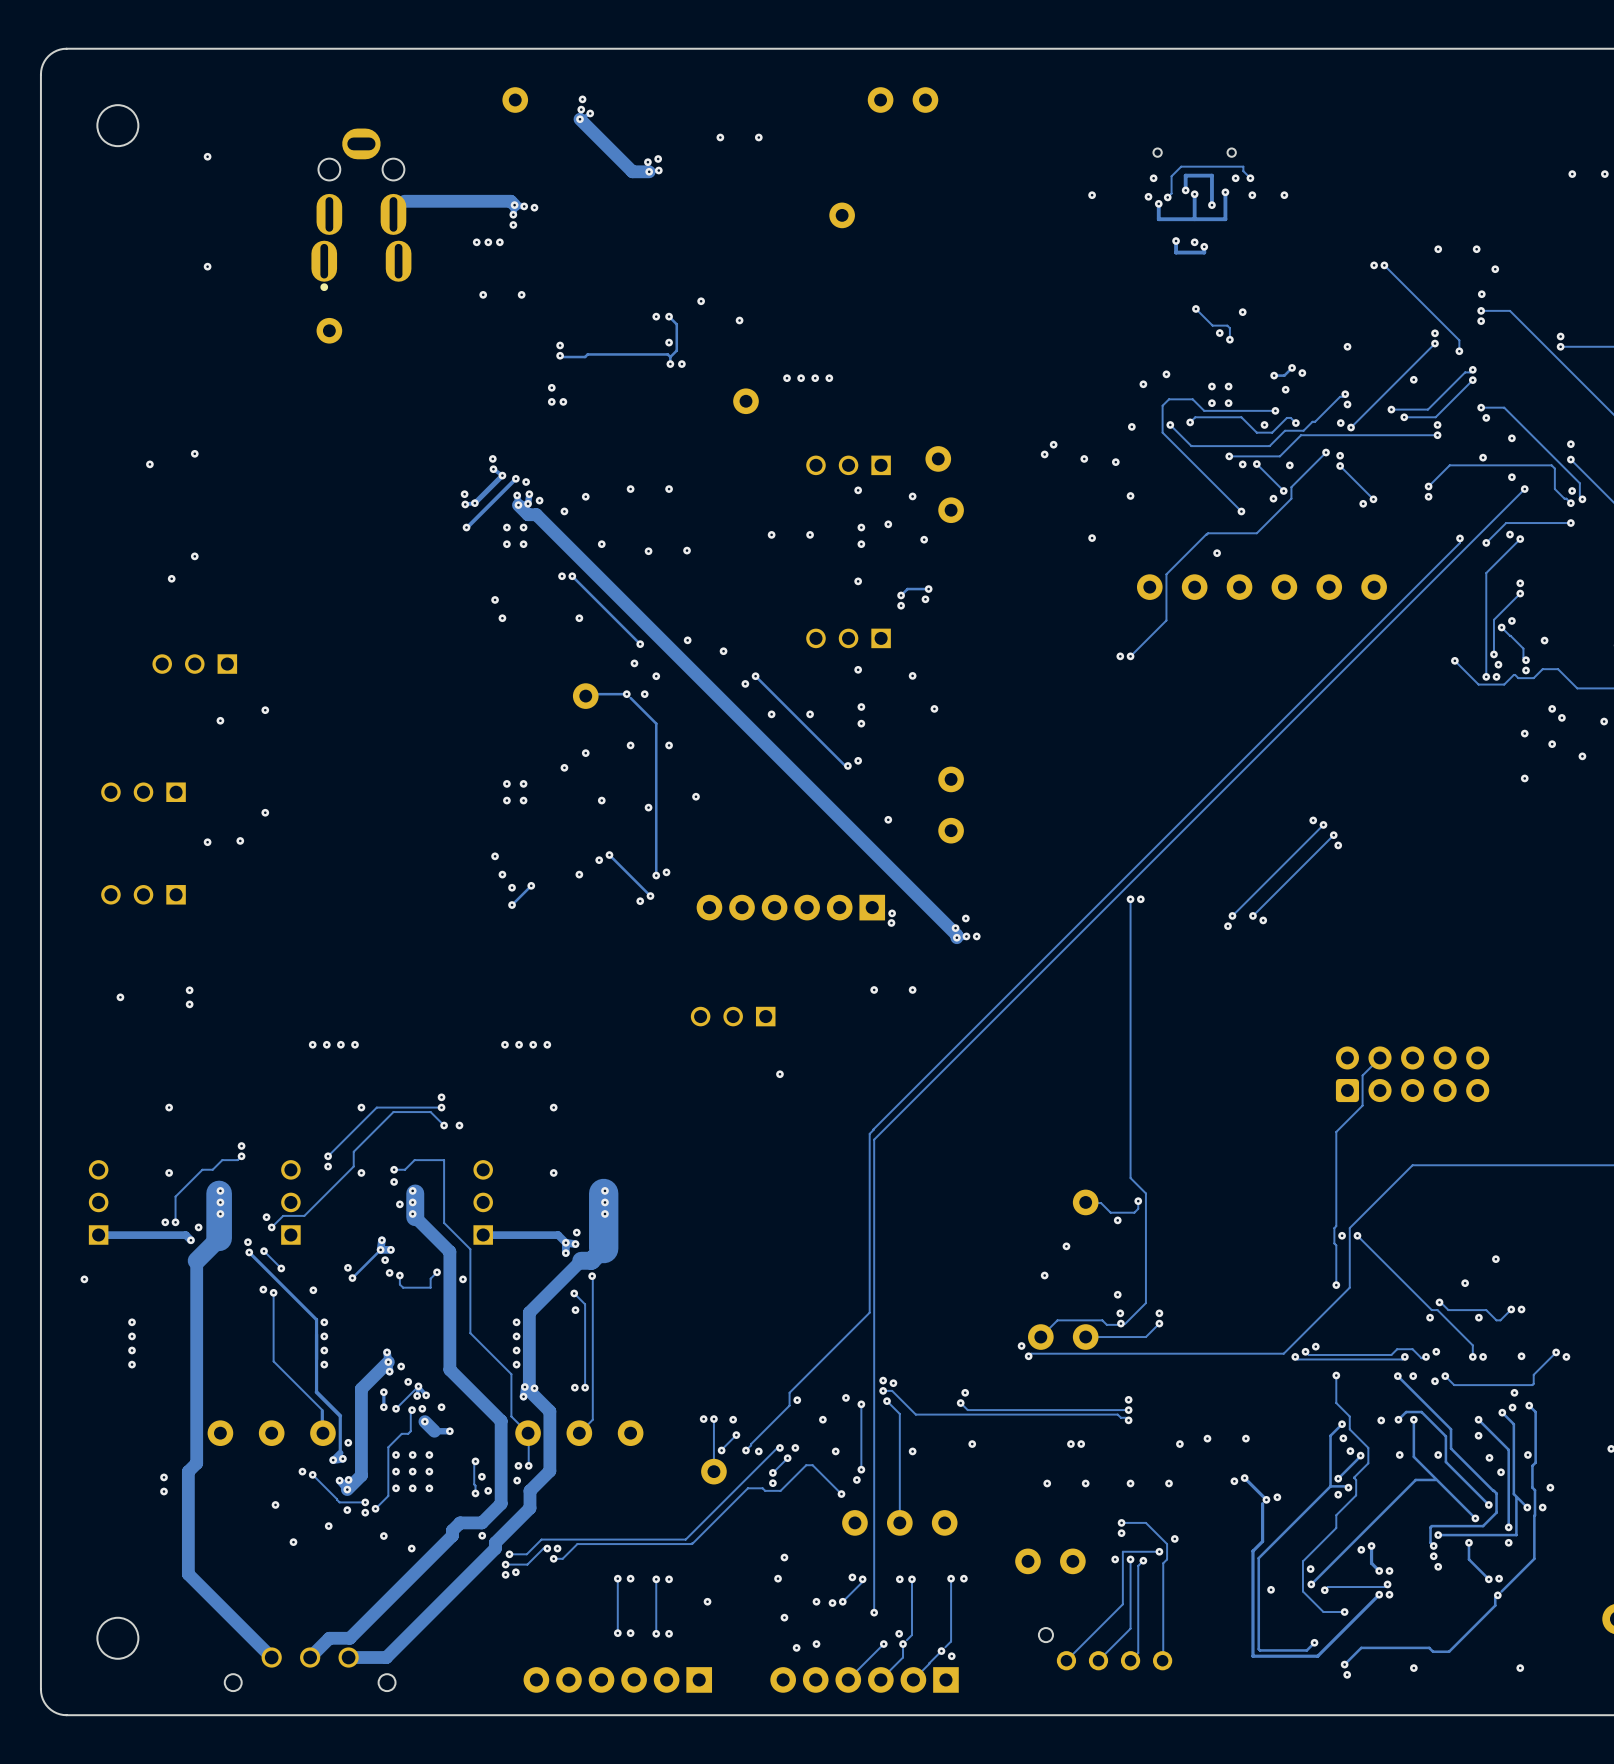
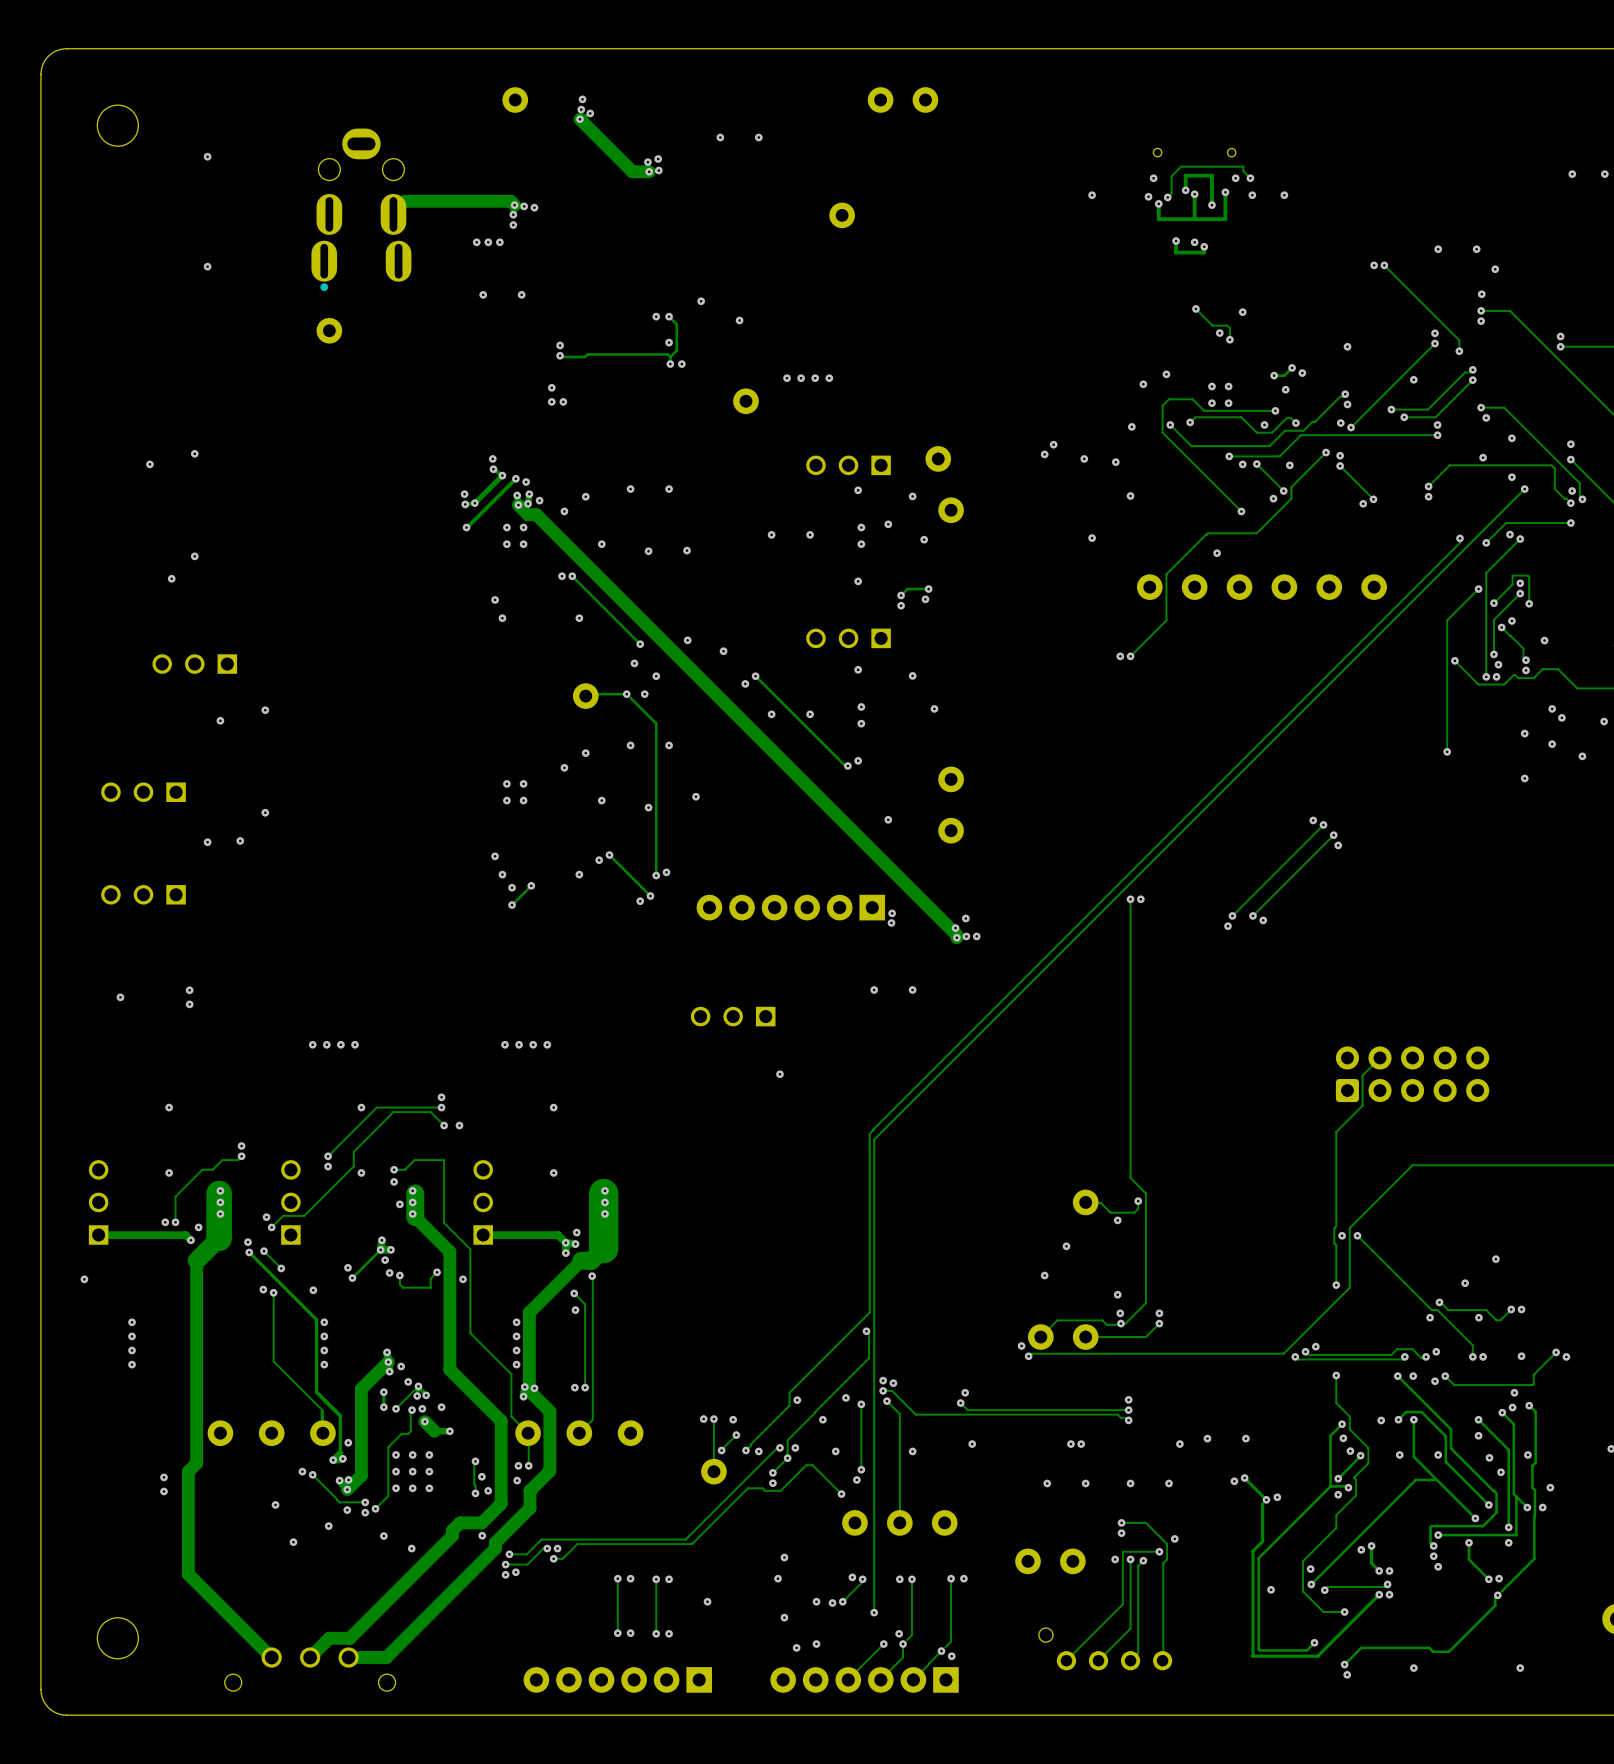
track: none -> (1478, 589) (1447, 620) (1447, 751)
via: none -> (1478, 589)
track: none -> (1493, 603) (1512, 584) (1512, 575) (1527, 575) (1529, 603)
via: none -> (1493, 603)
via: none -> (1529, 603)
via: none -> (1447, 751)
track: none -> (866, 1331) (869, 1333) (869, 1358) (787, 1440) (787, 1455)
via: none -> (866, 1331)

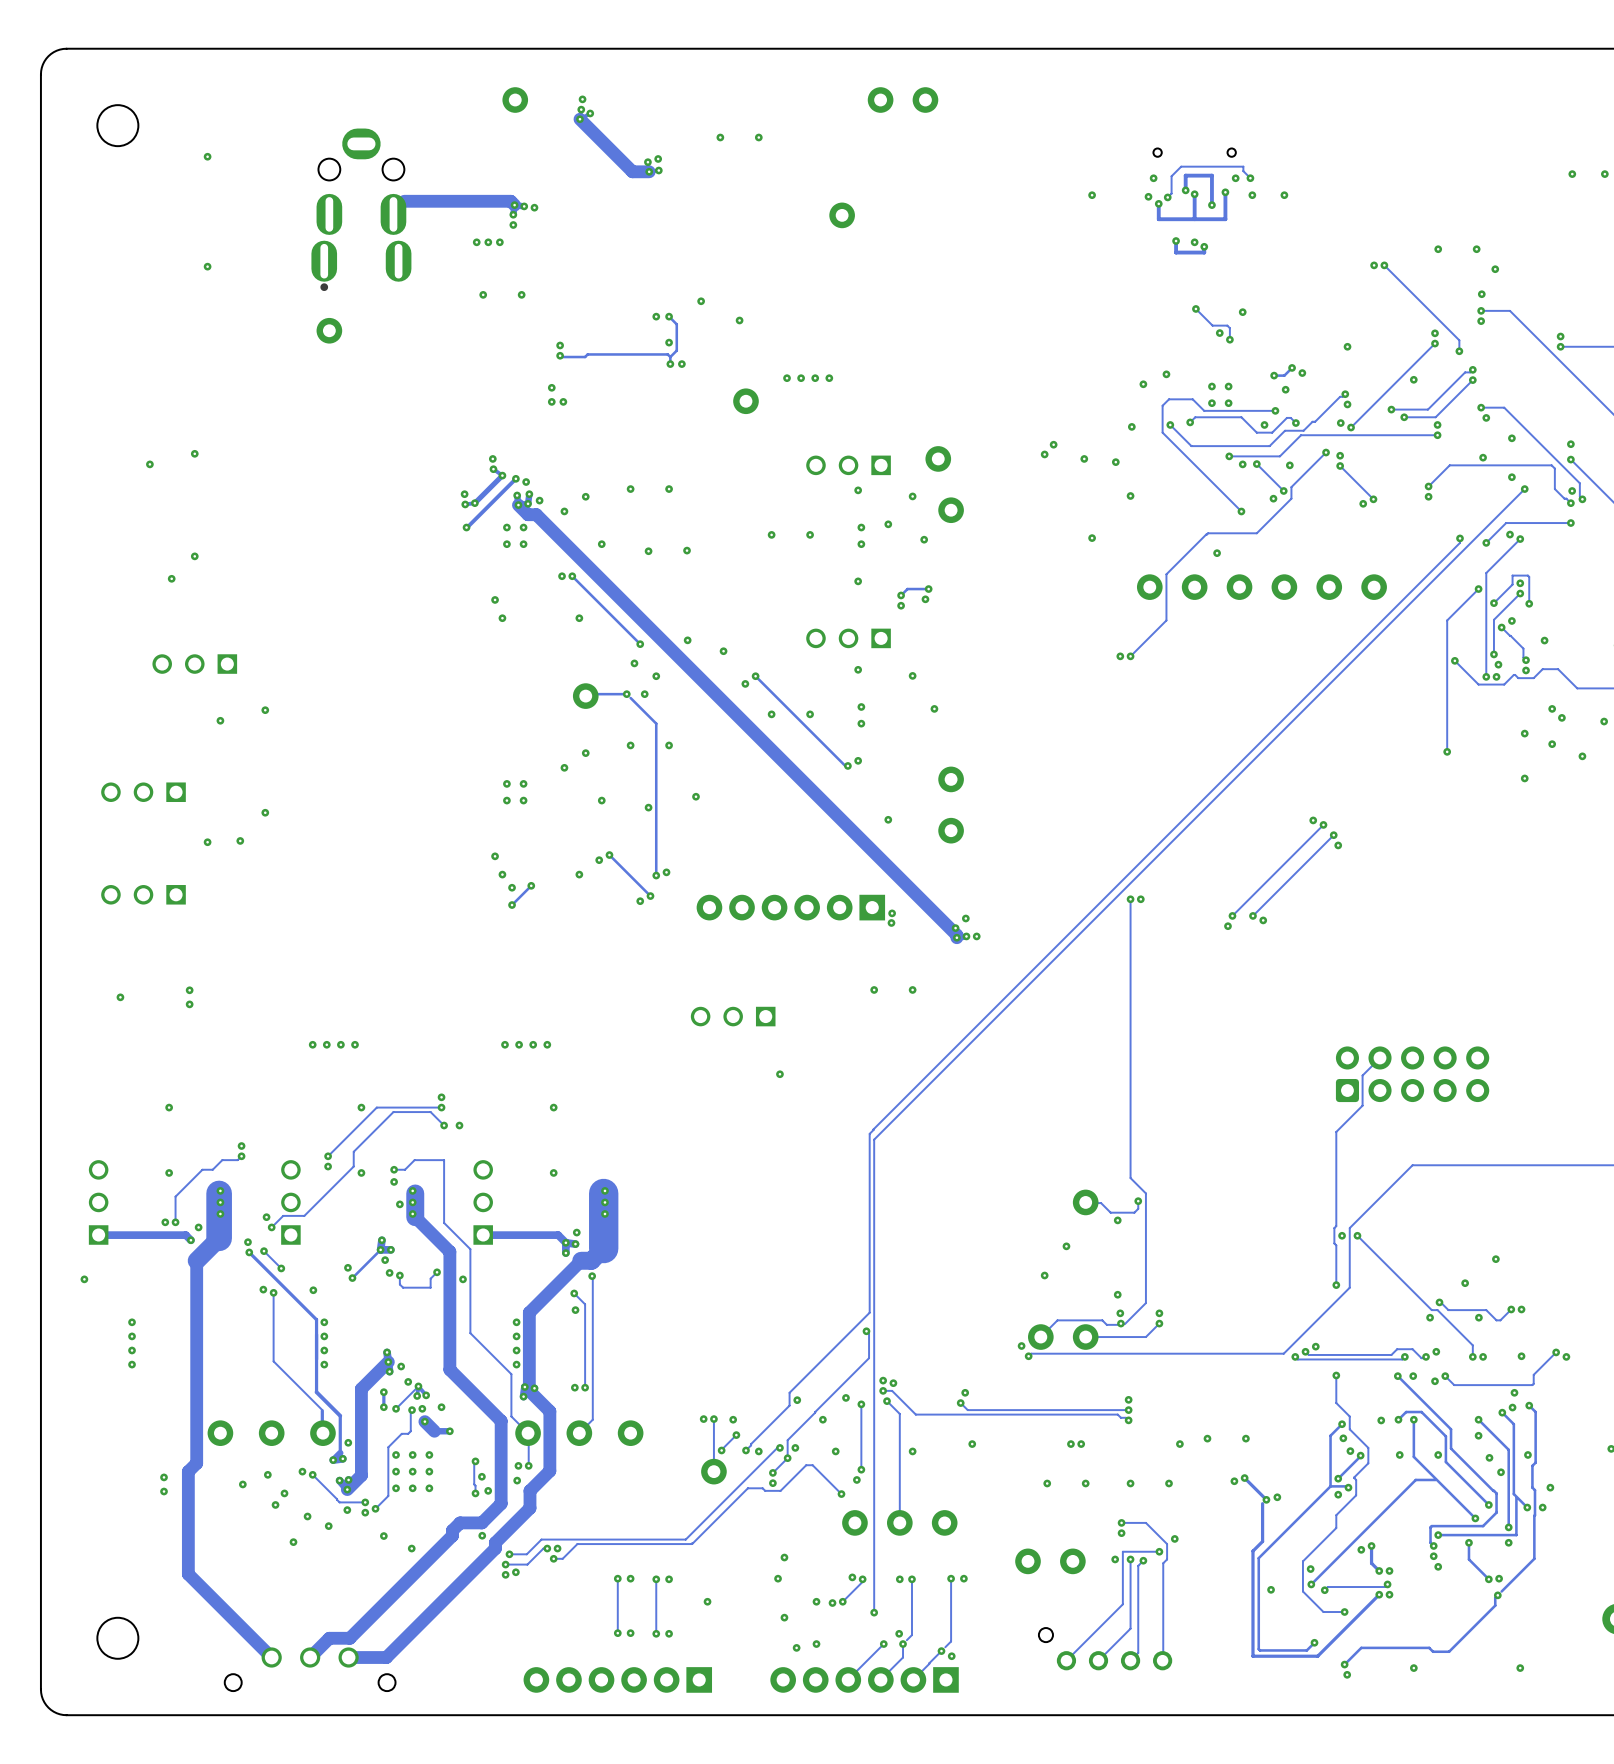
via: none -> (267, 1474)
via: none -> (242, 1484)
via: none -> (284, 1493)
via: none -> (307, 1516)

